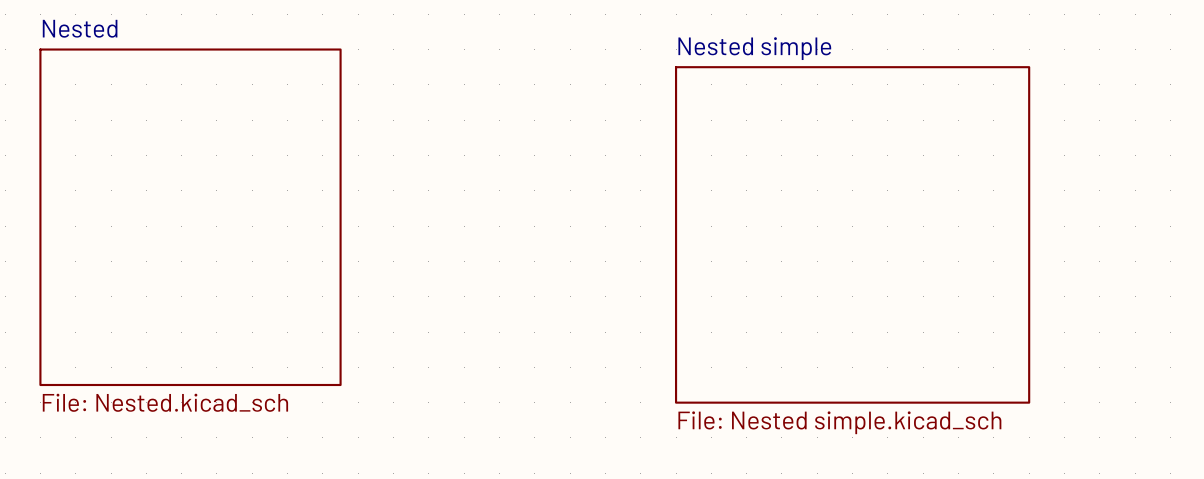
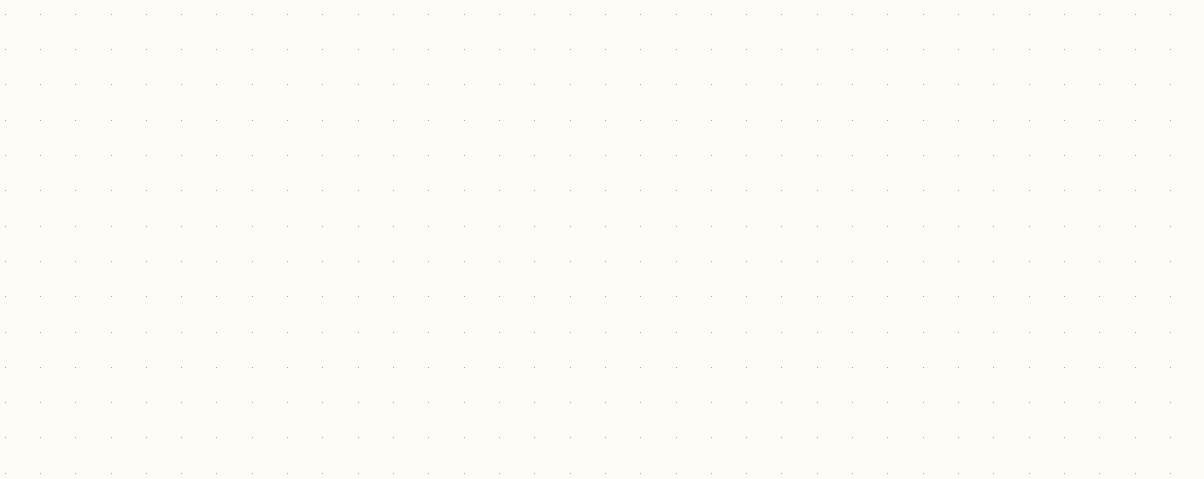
sheet Nested: File: Nested.kicad_sch (190, 217) -> none
sheet Nested simple: File: Nested simple.kicad_sch (852, 234) -> none

